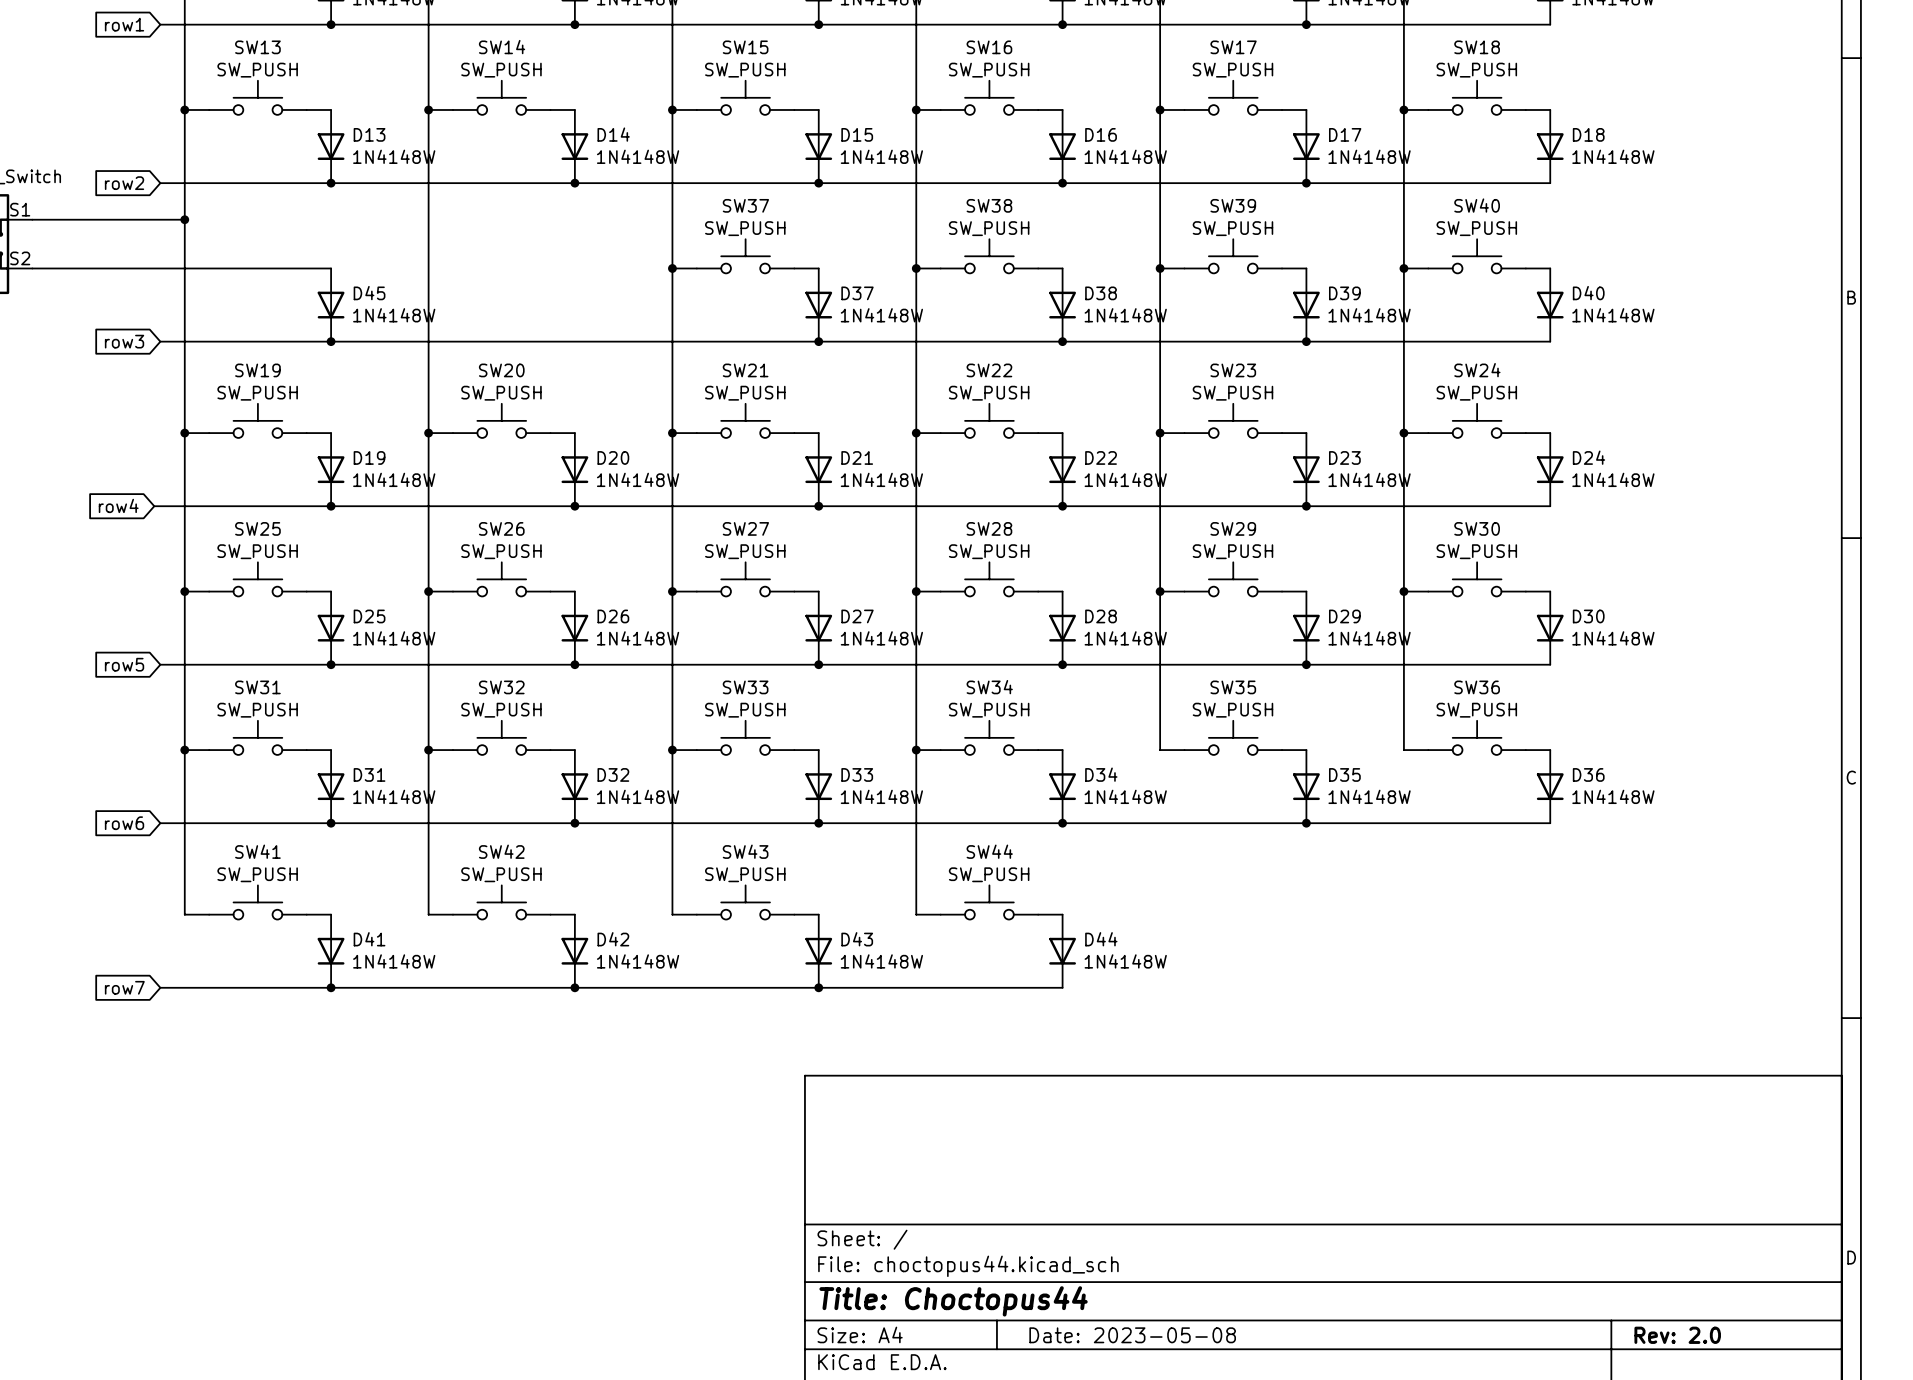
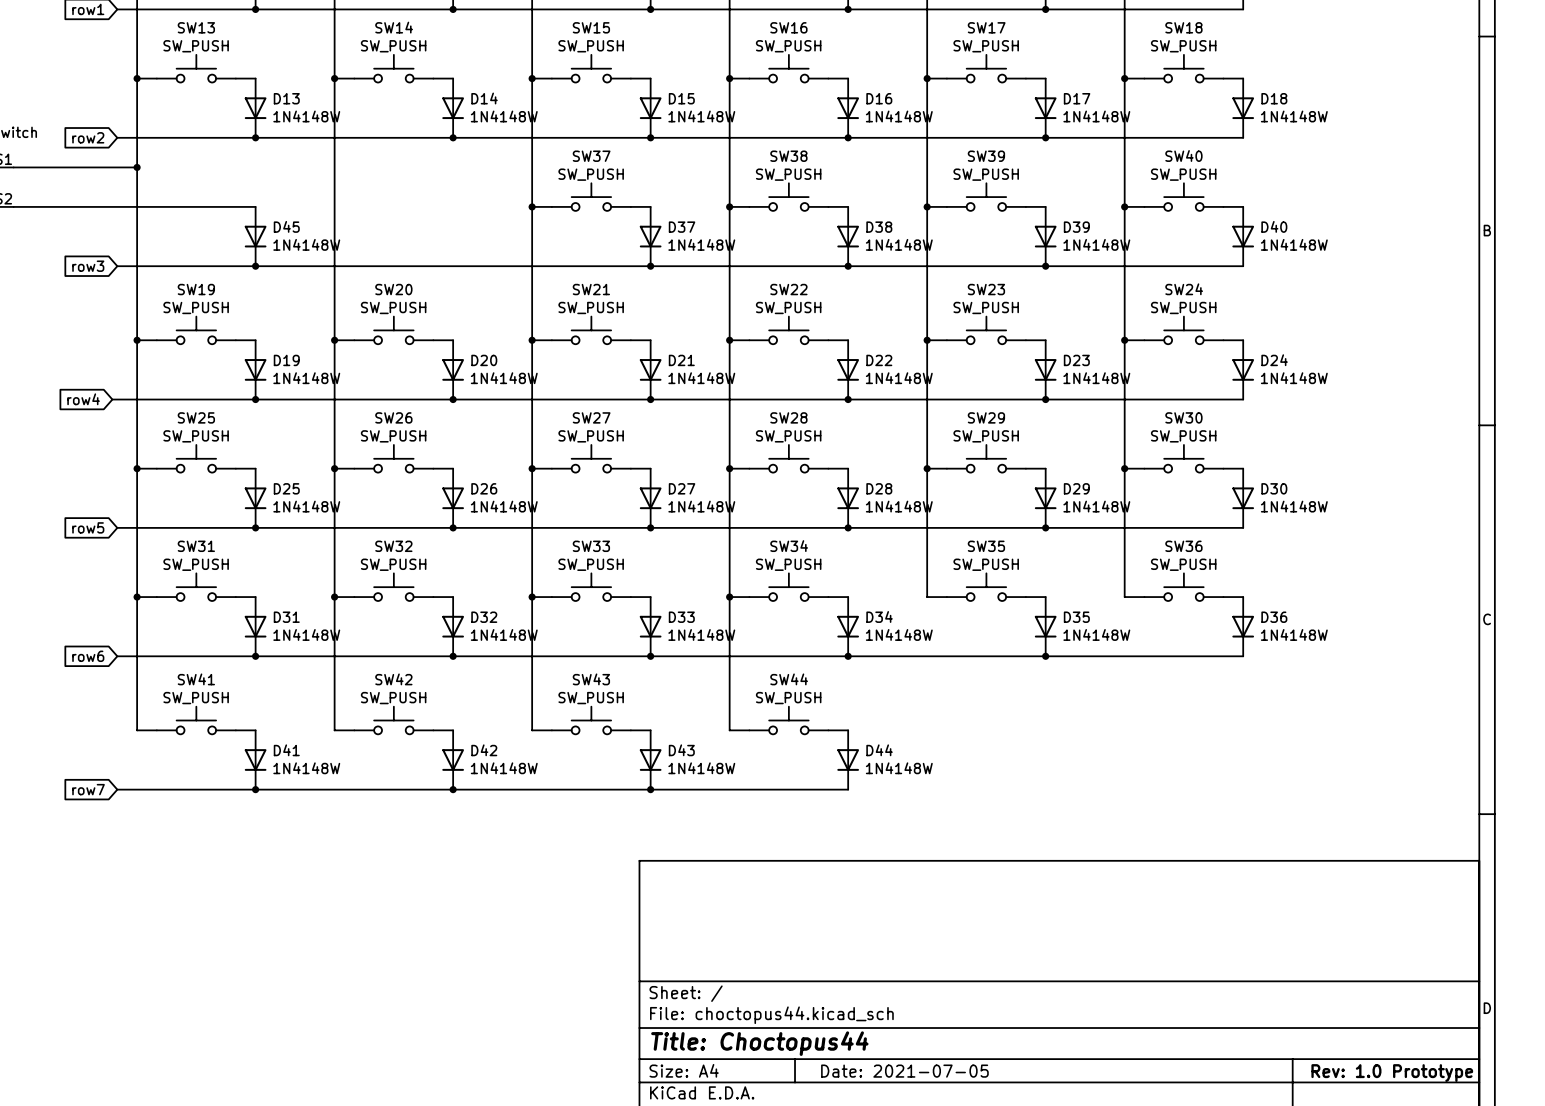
title block: Date: 2023-05-08 (1132, 1335) -> Date: 2021-07-05 (904, 1071)
title block: Rev: 2.0 (1677, 1335) -> Rev: 1.0 Prototype (1392, 1073)

